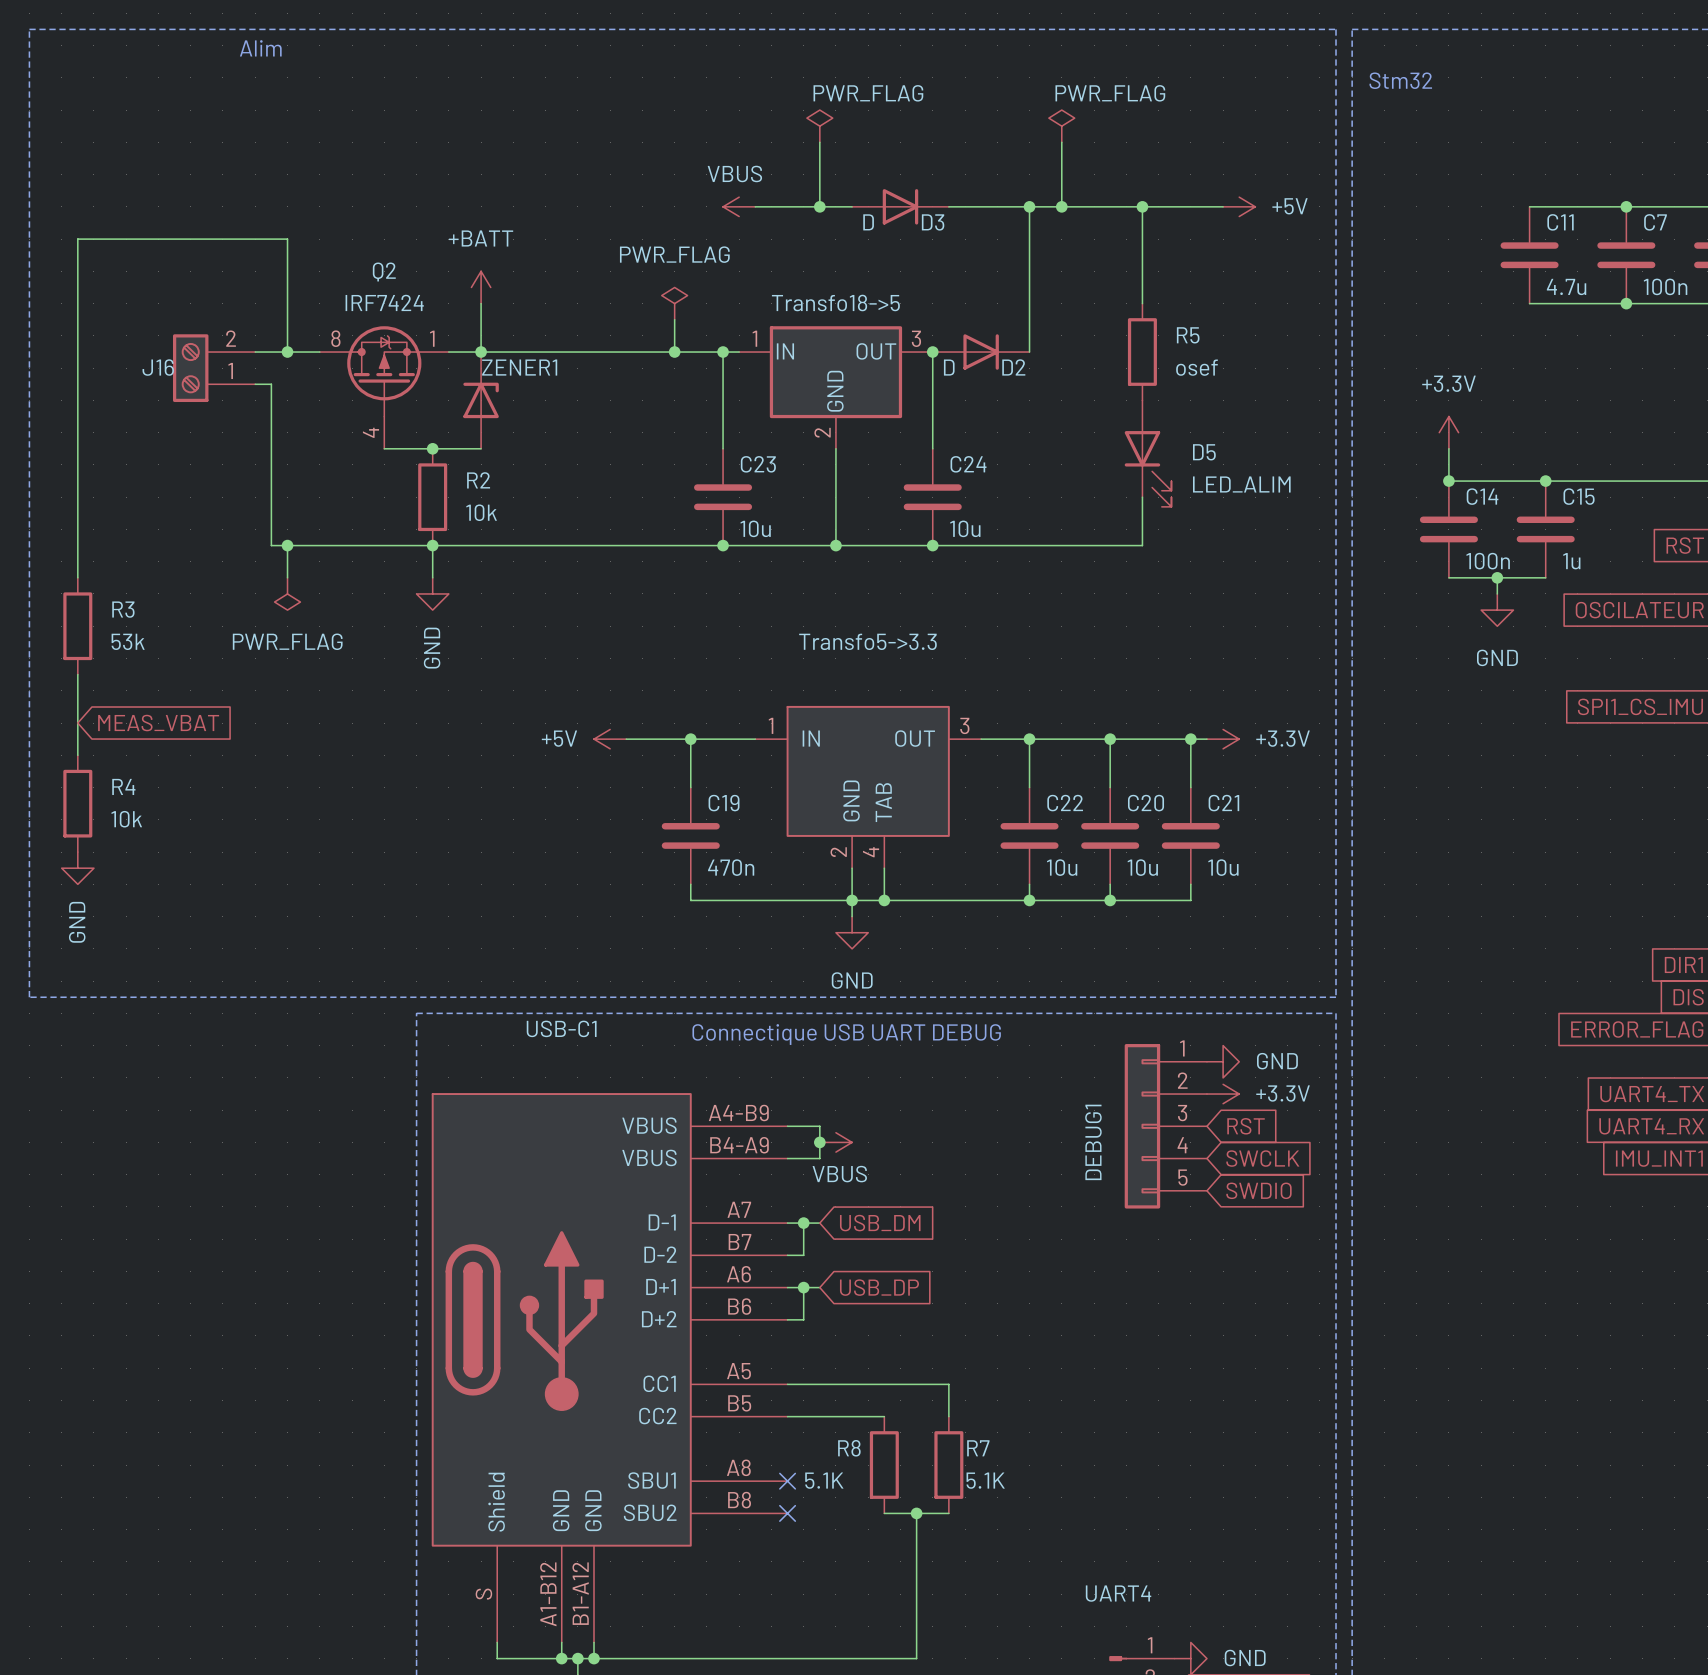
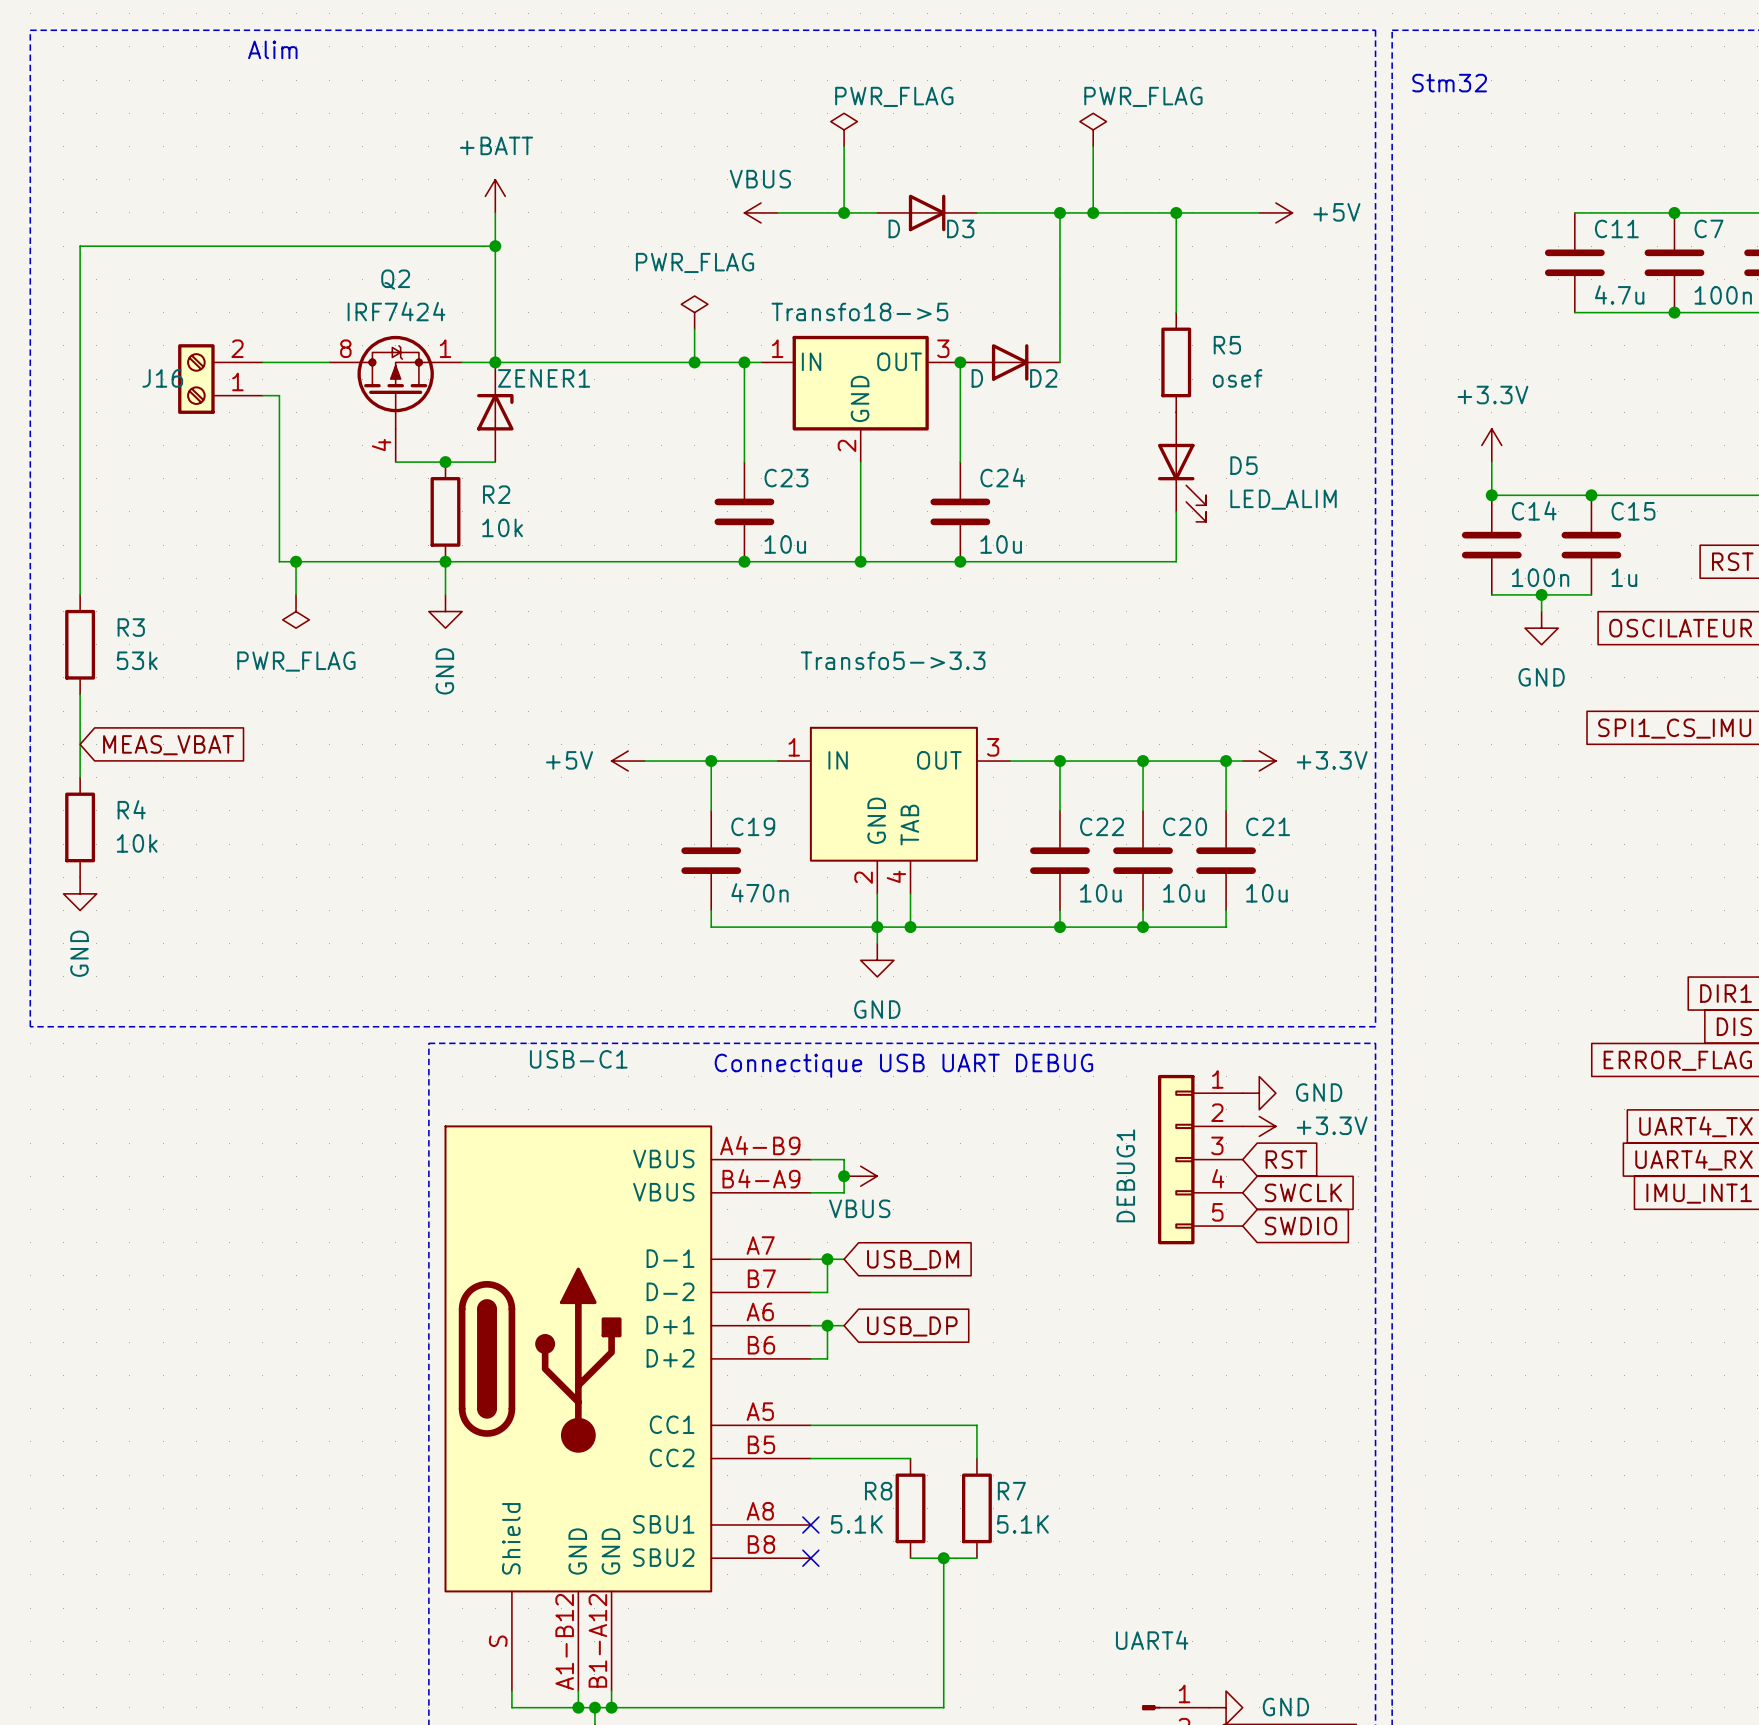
wire: none -> (495, 212) (495, 312)
wire: (287, 239) (287, 352) -> (296, 246) (495, 246)
junction: none -> (495, 246)
power symbol position: +BATT (481, 287) -> +BATT (495, 196)
junction: (287, 352) -> none

